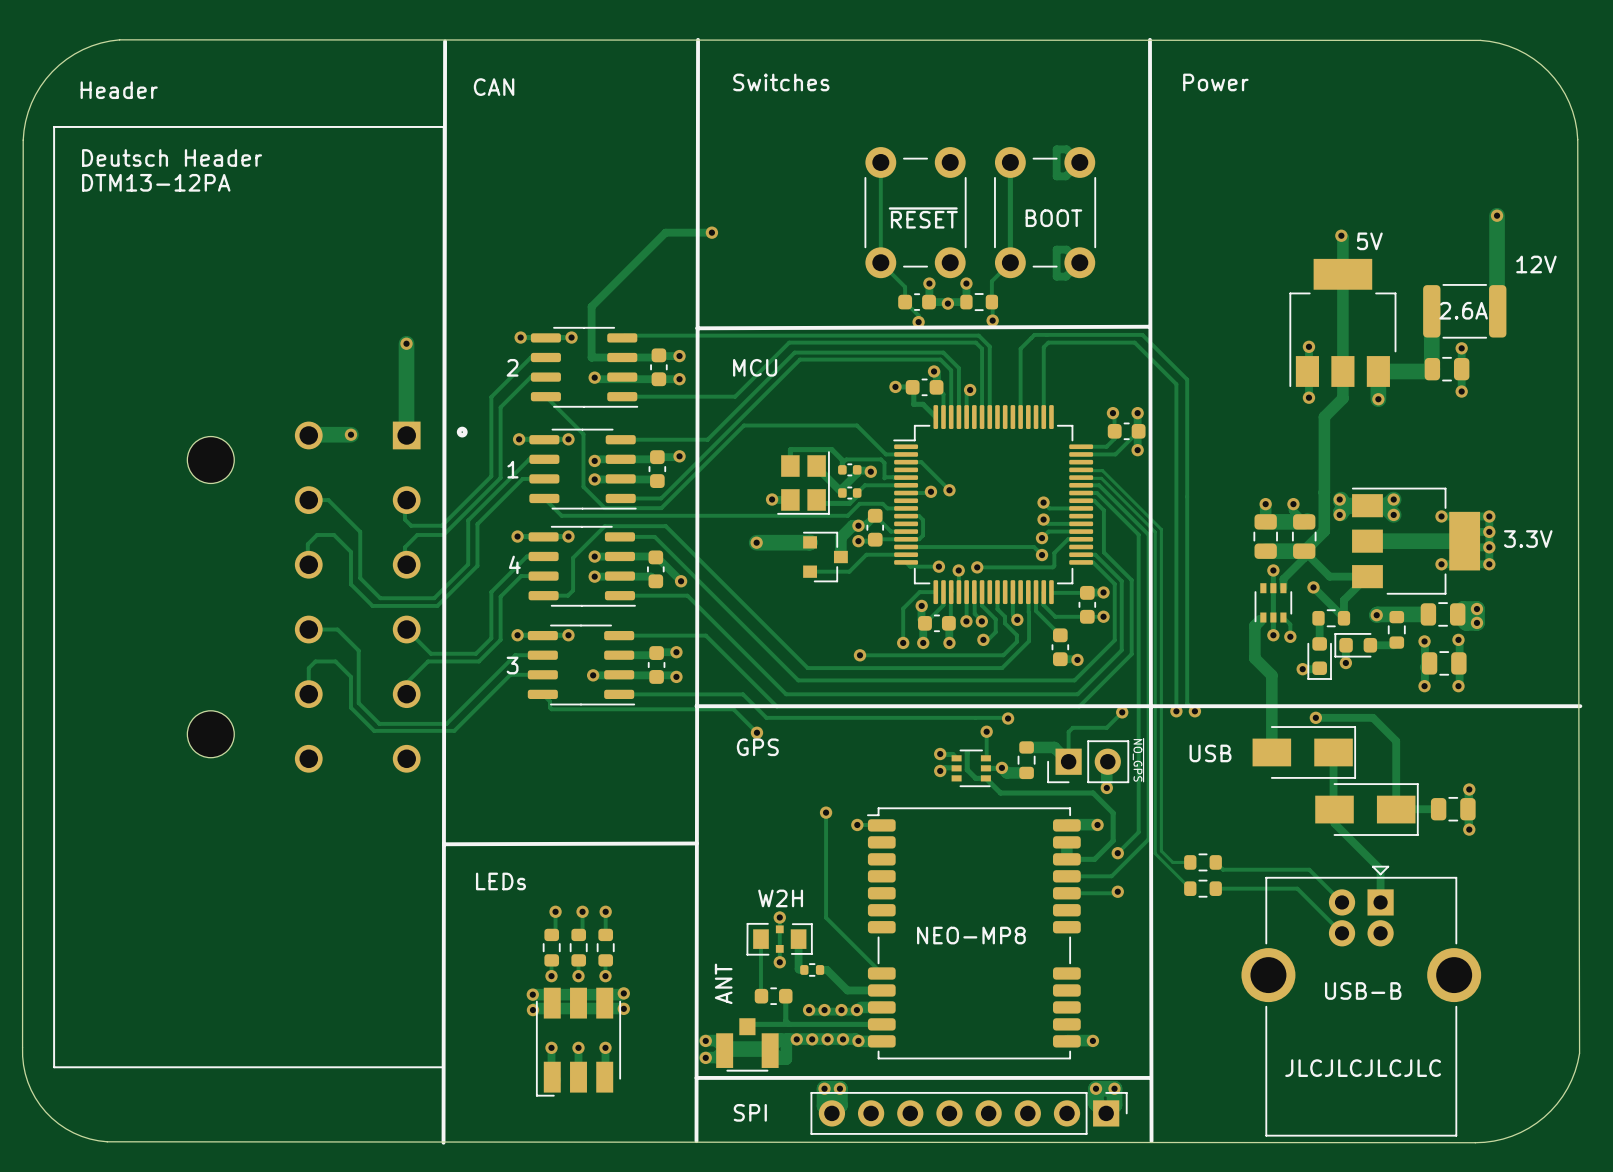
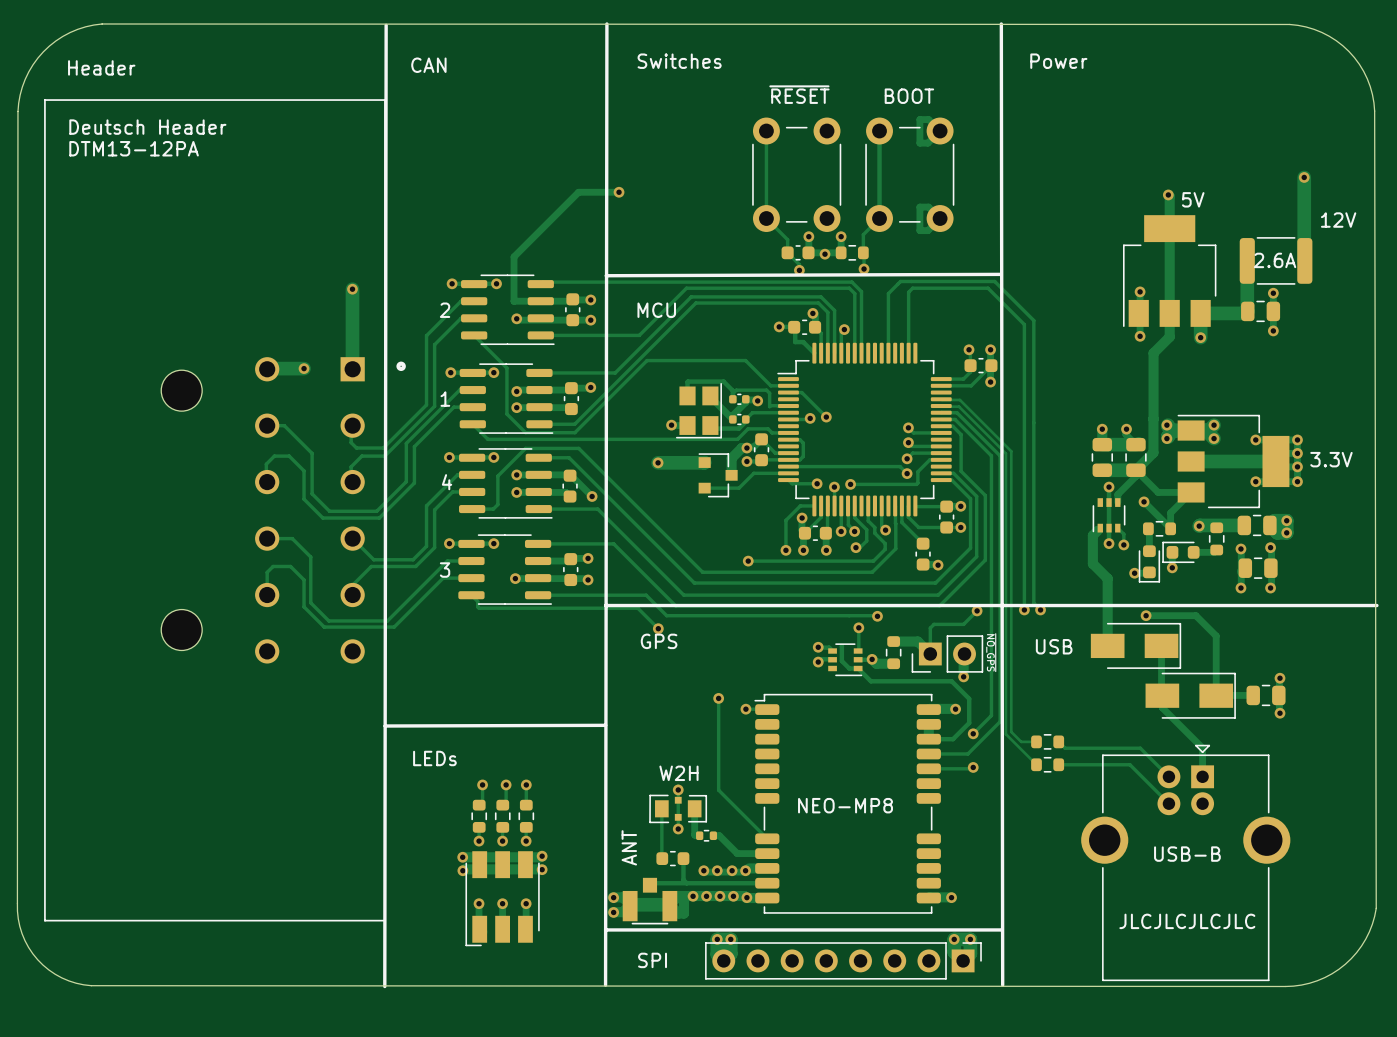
text position: ~{RESET} (923, 217) -> ~{RESET} (799, 94)
text position: BOOT (1053, 218) -> BOOT (909, 96)

